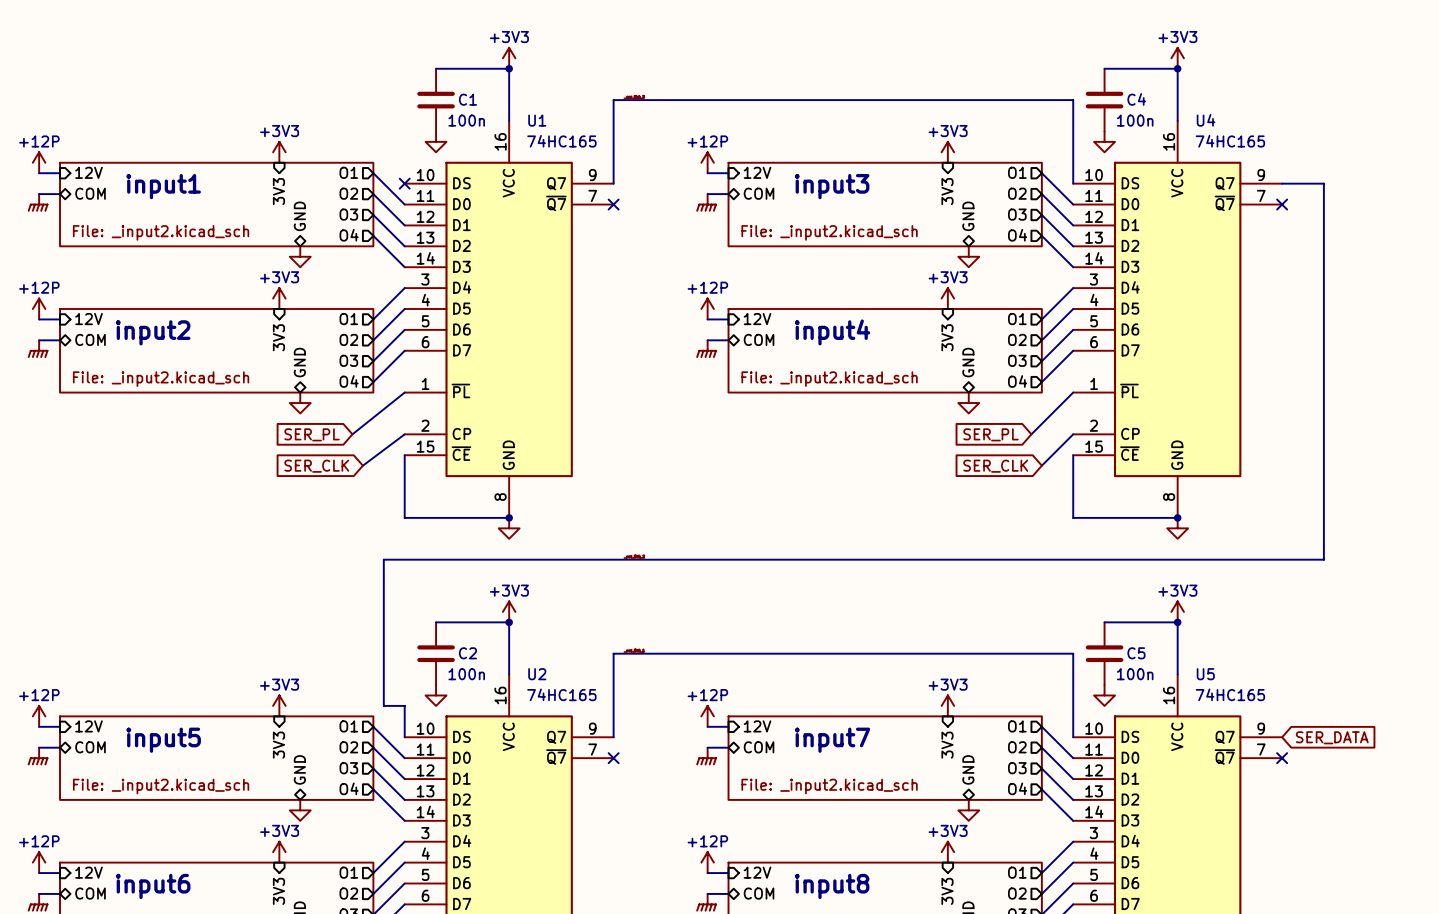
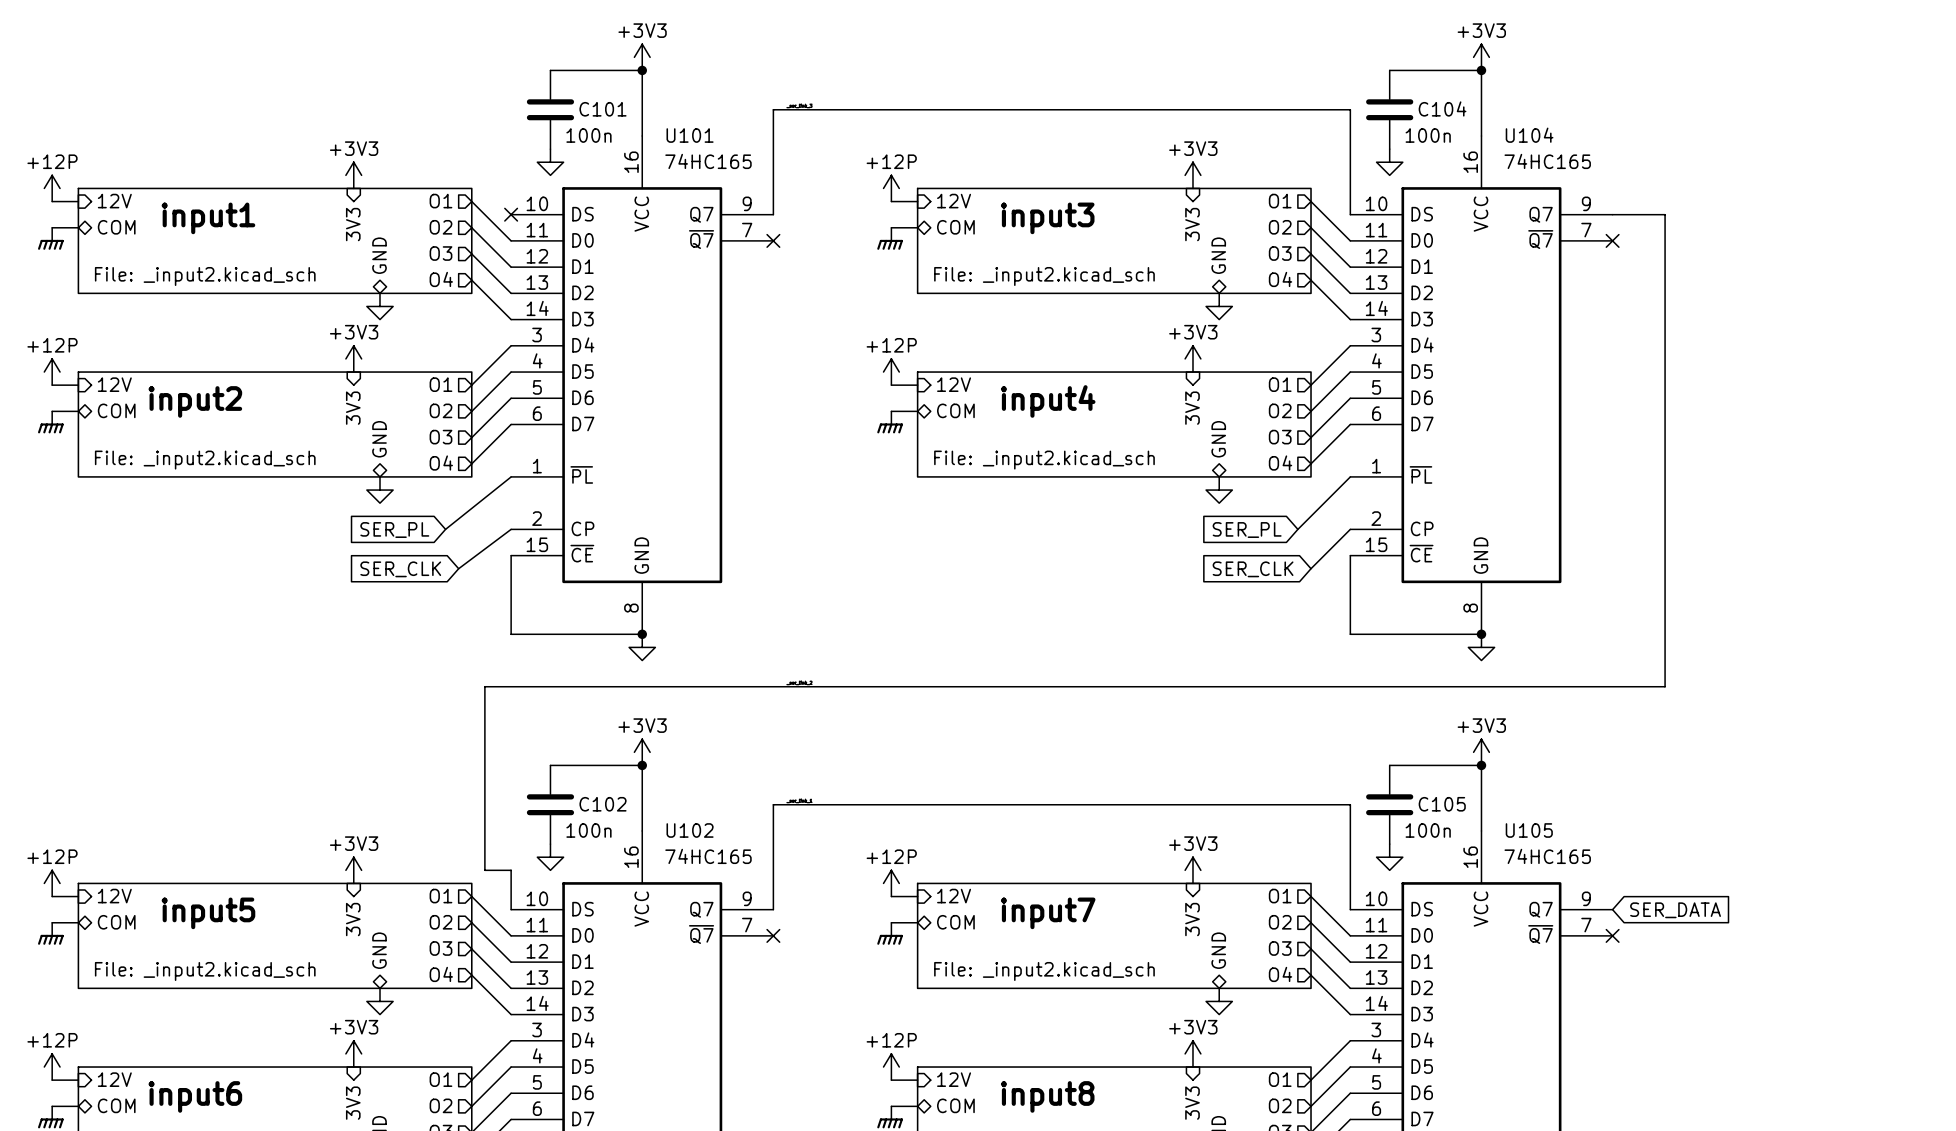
C1 name: C1 (467, 99) -> C101 (603, 109)
C4 name: C4 (1136, 99) -> C104 (1442, 108)
U1 name: U1 (537, 120) -> U101 (690, 135)
U4 name: U4 (1206, 120) -> U104 (1529, 135)
C2 name: C2 (467, 653) -> C102 (603, 804)
C5 name: C5 (1136, 653) -> C105 (1442, 804)
U2 name: U2 (537, 674) -> U102 (690, 830)
U5 name: U5 (1205, 674) -> U105 (1529, 830)

